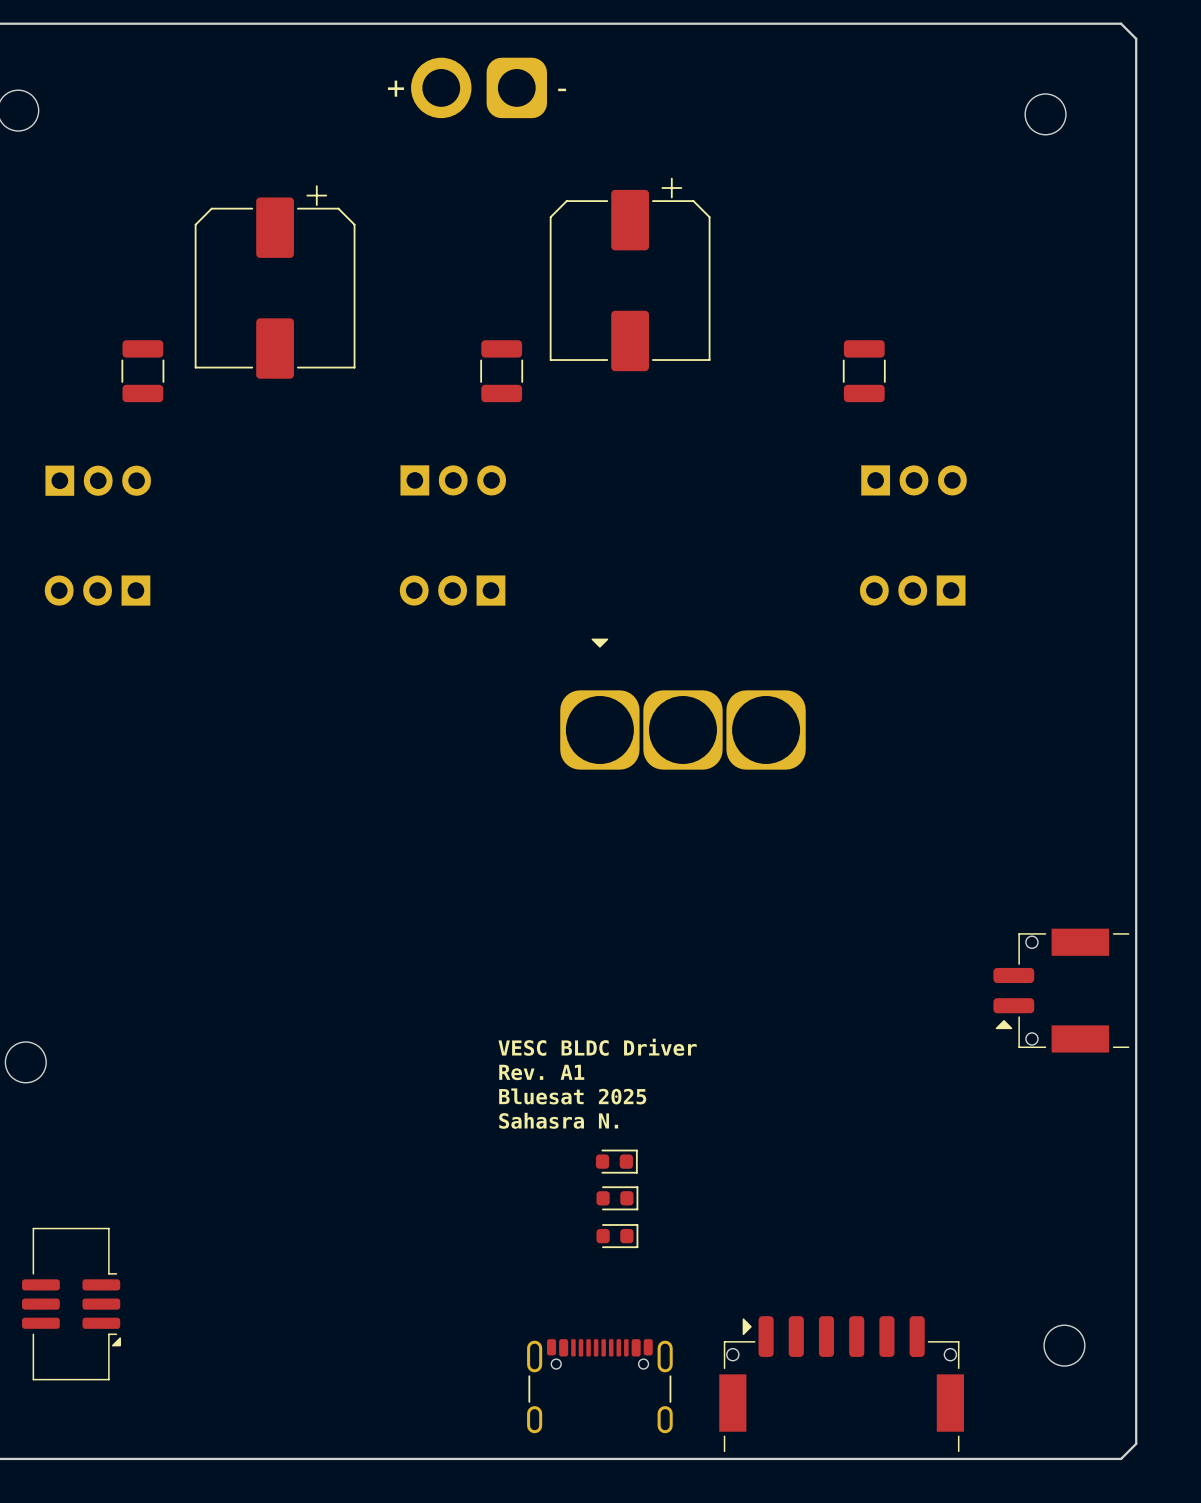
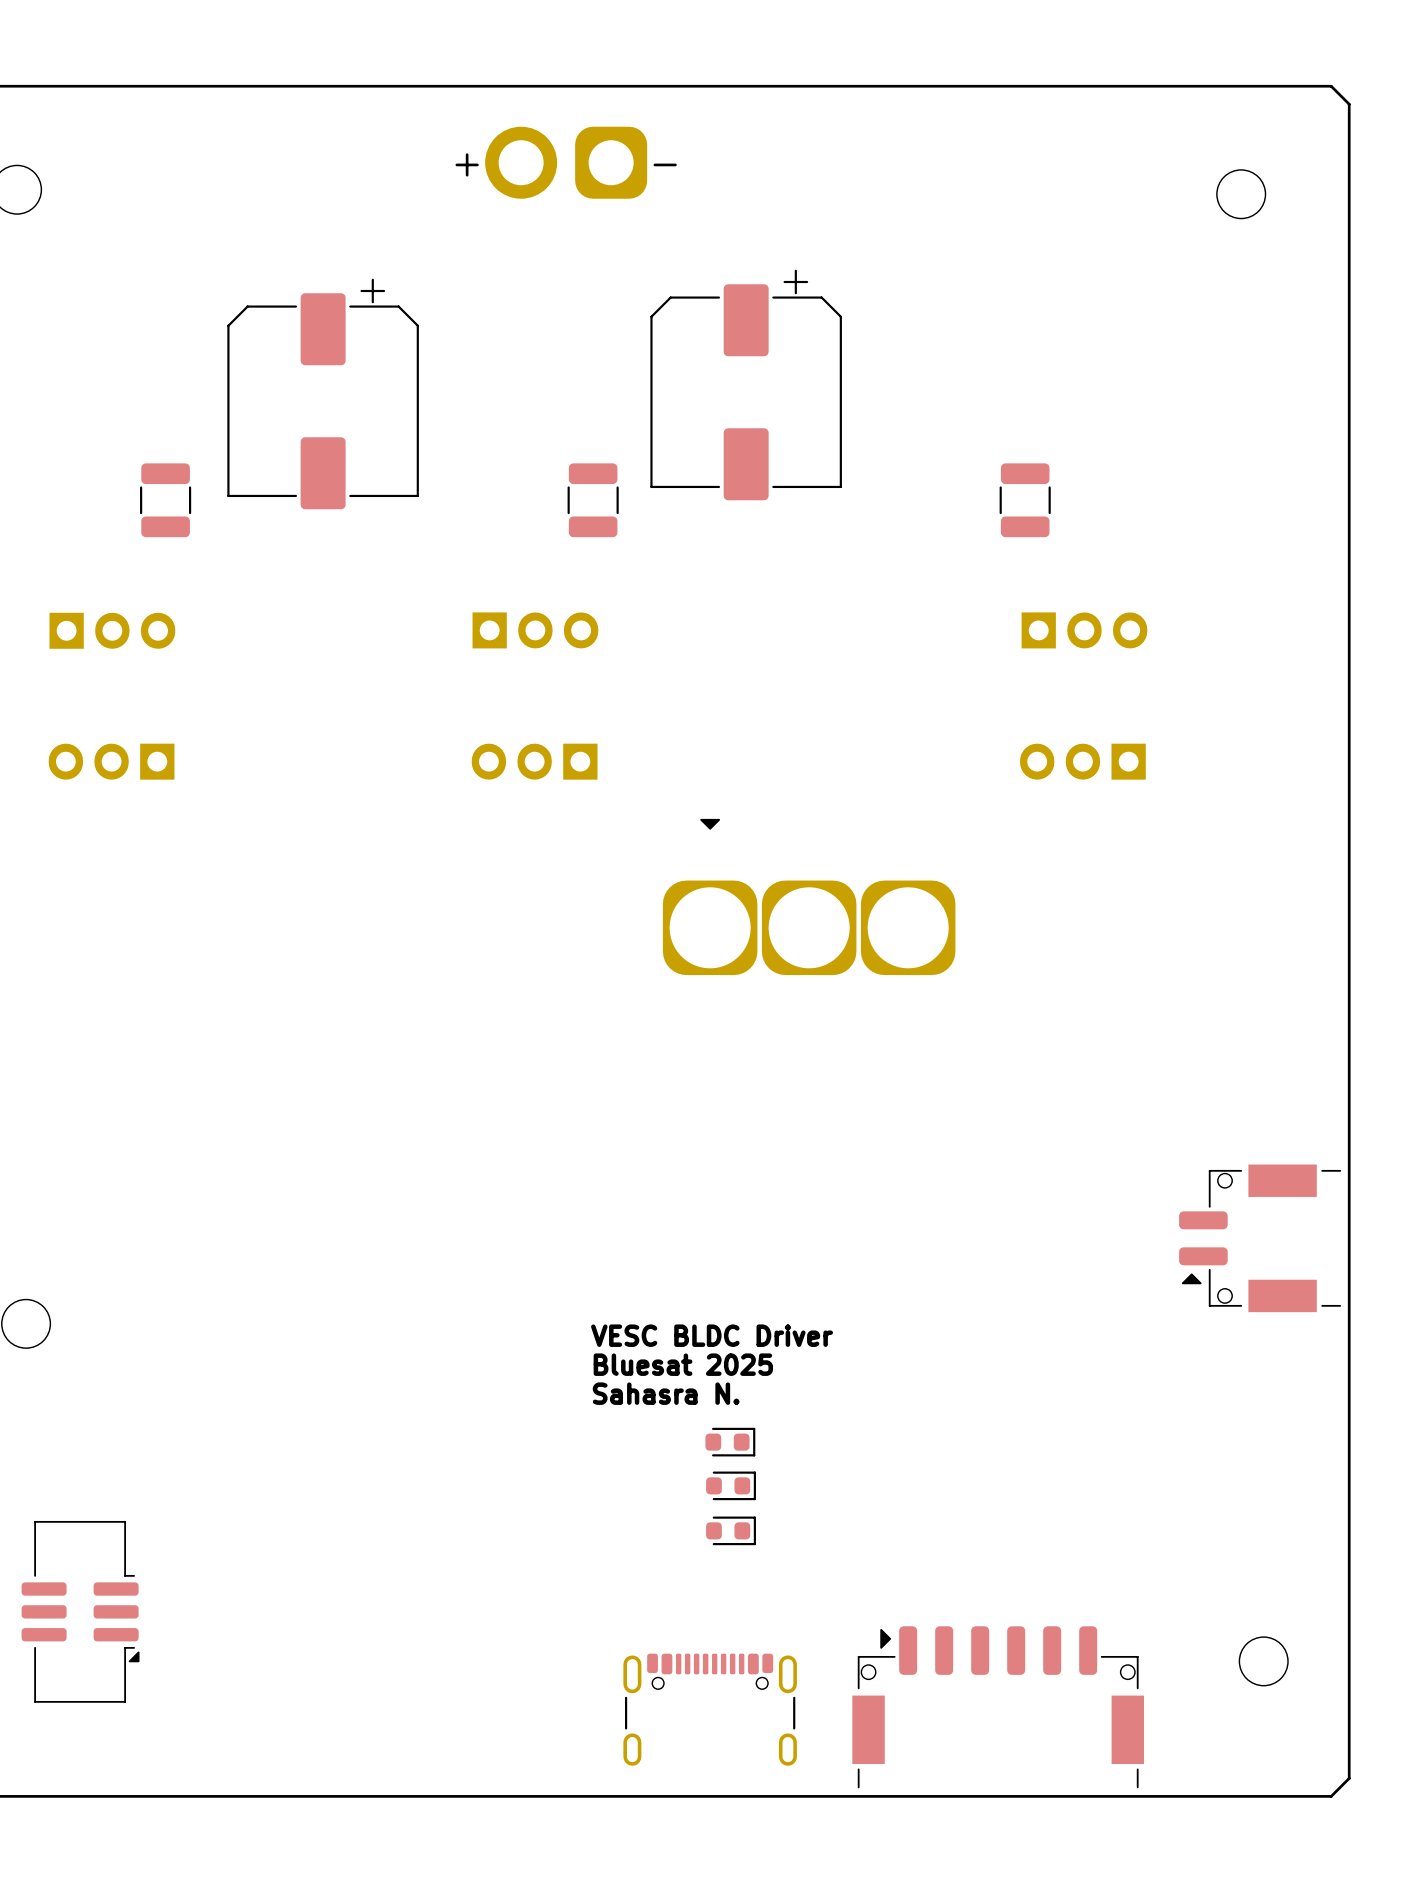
text: VESC BLDC Driver (597, 1047) -> none
text: Rev. A1 (541, 1072) -> VESC BLDC Driver (712, 1335)

